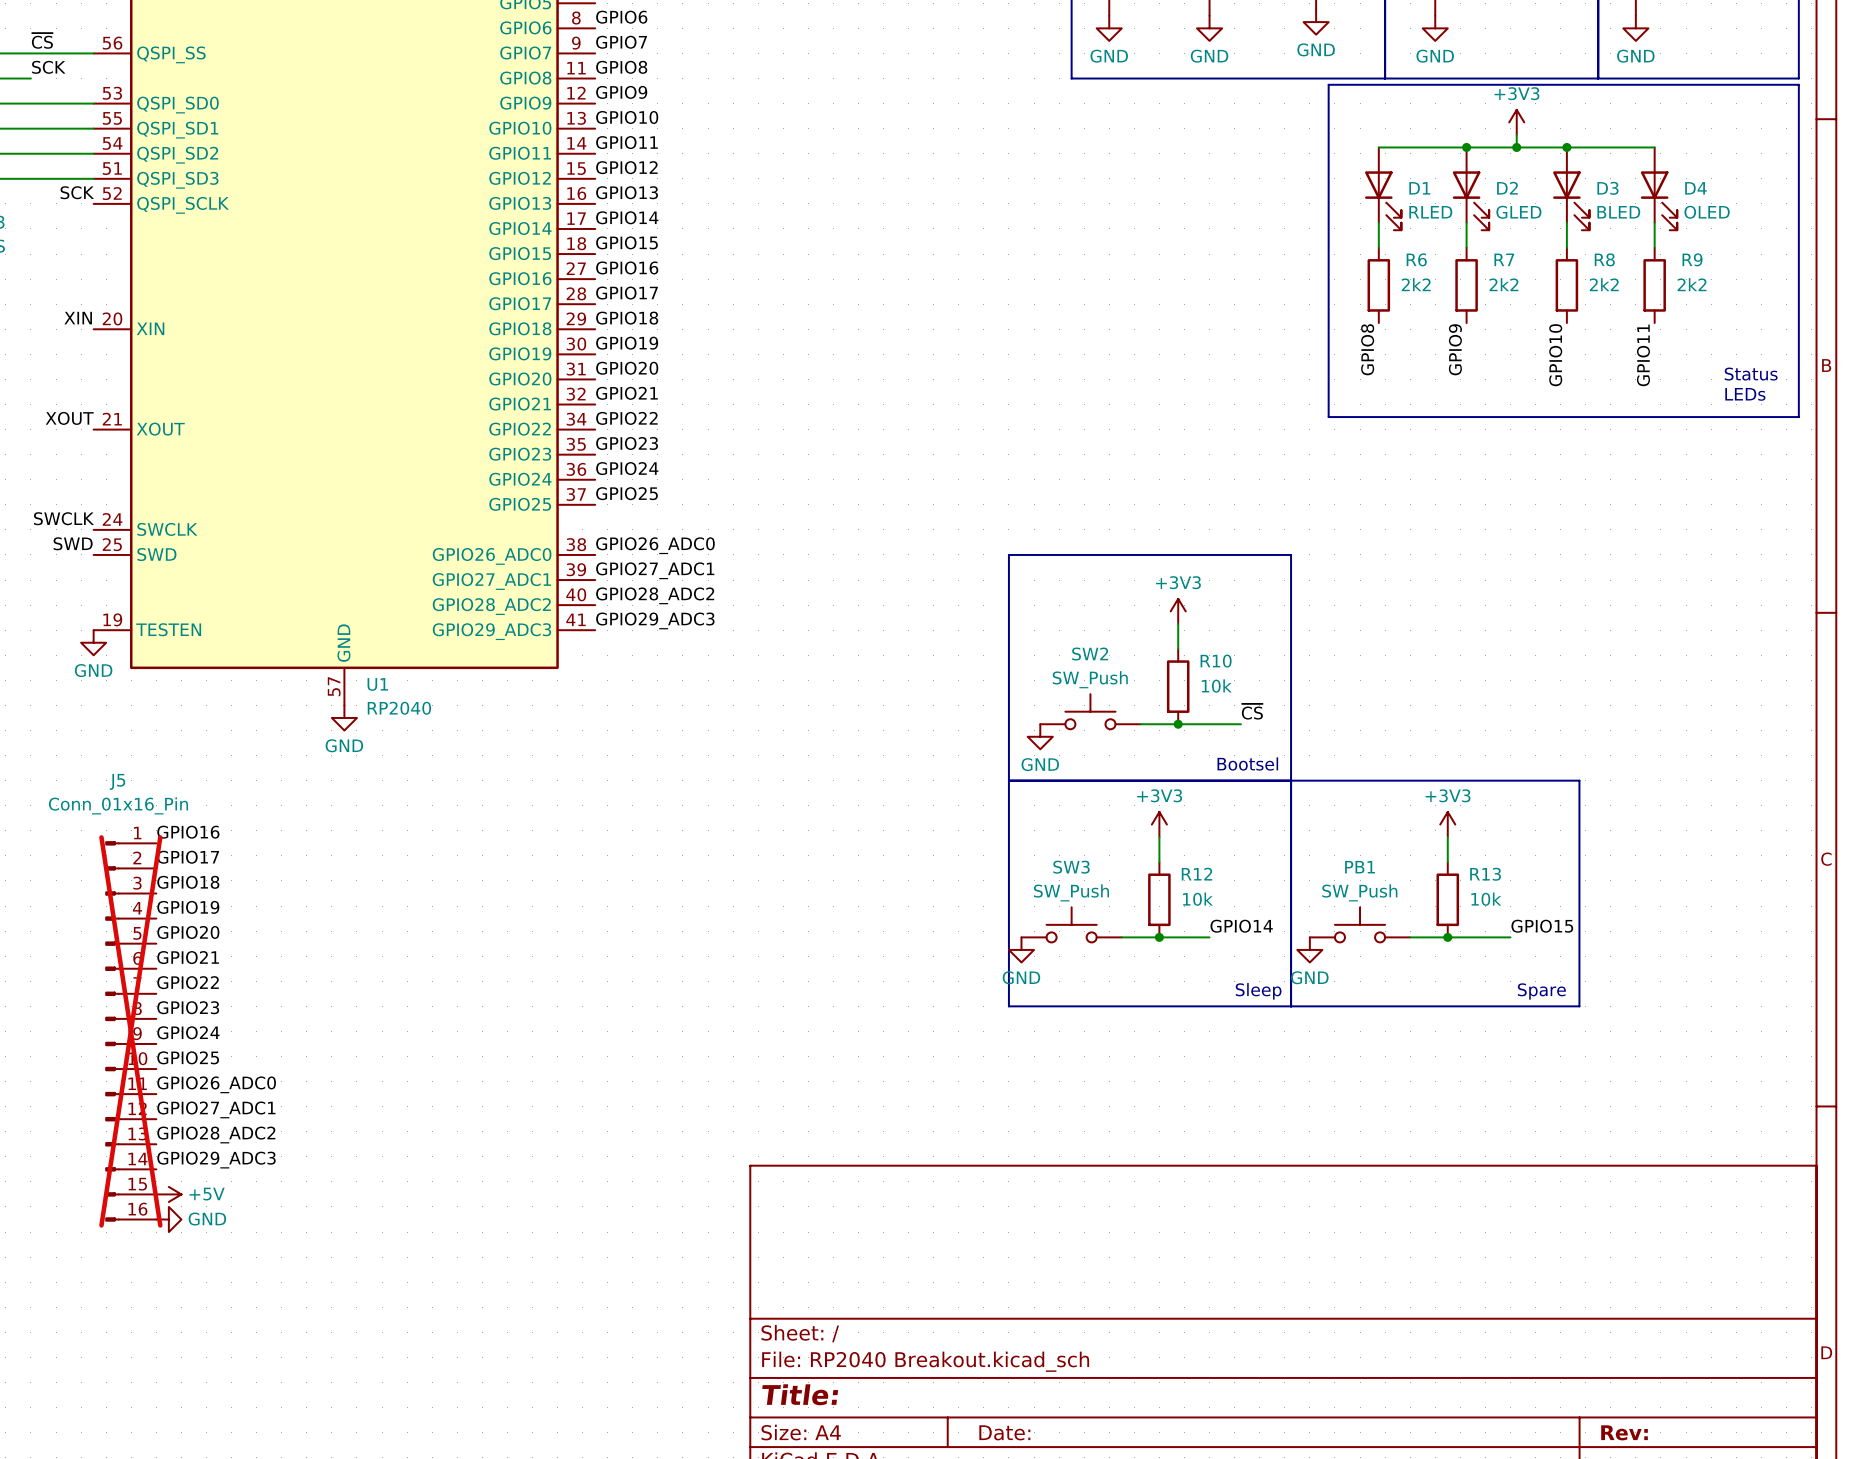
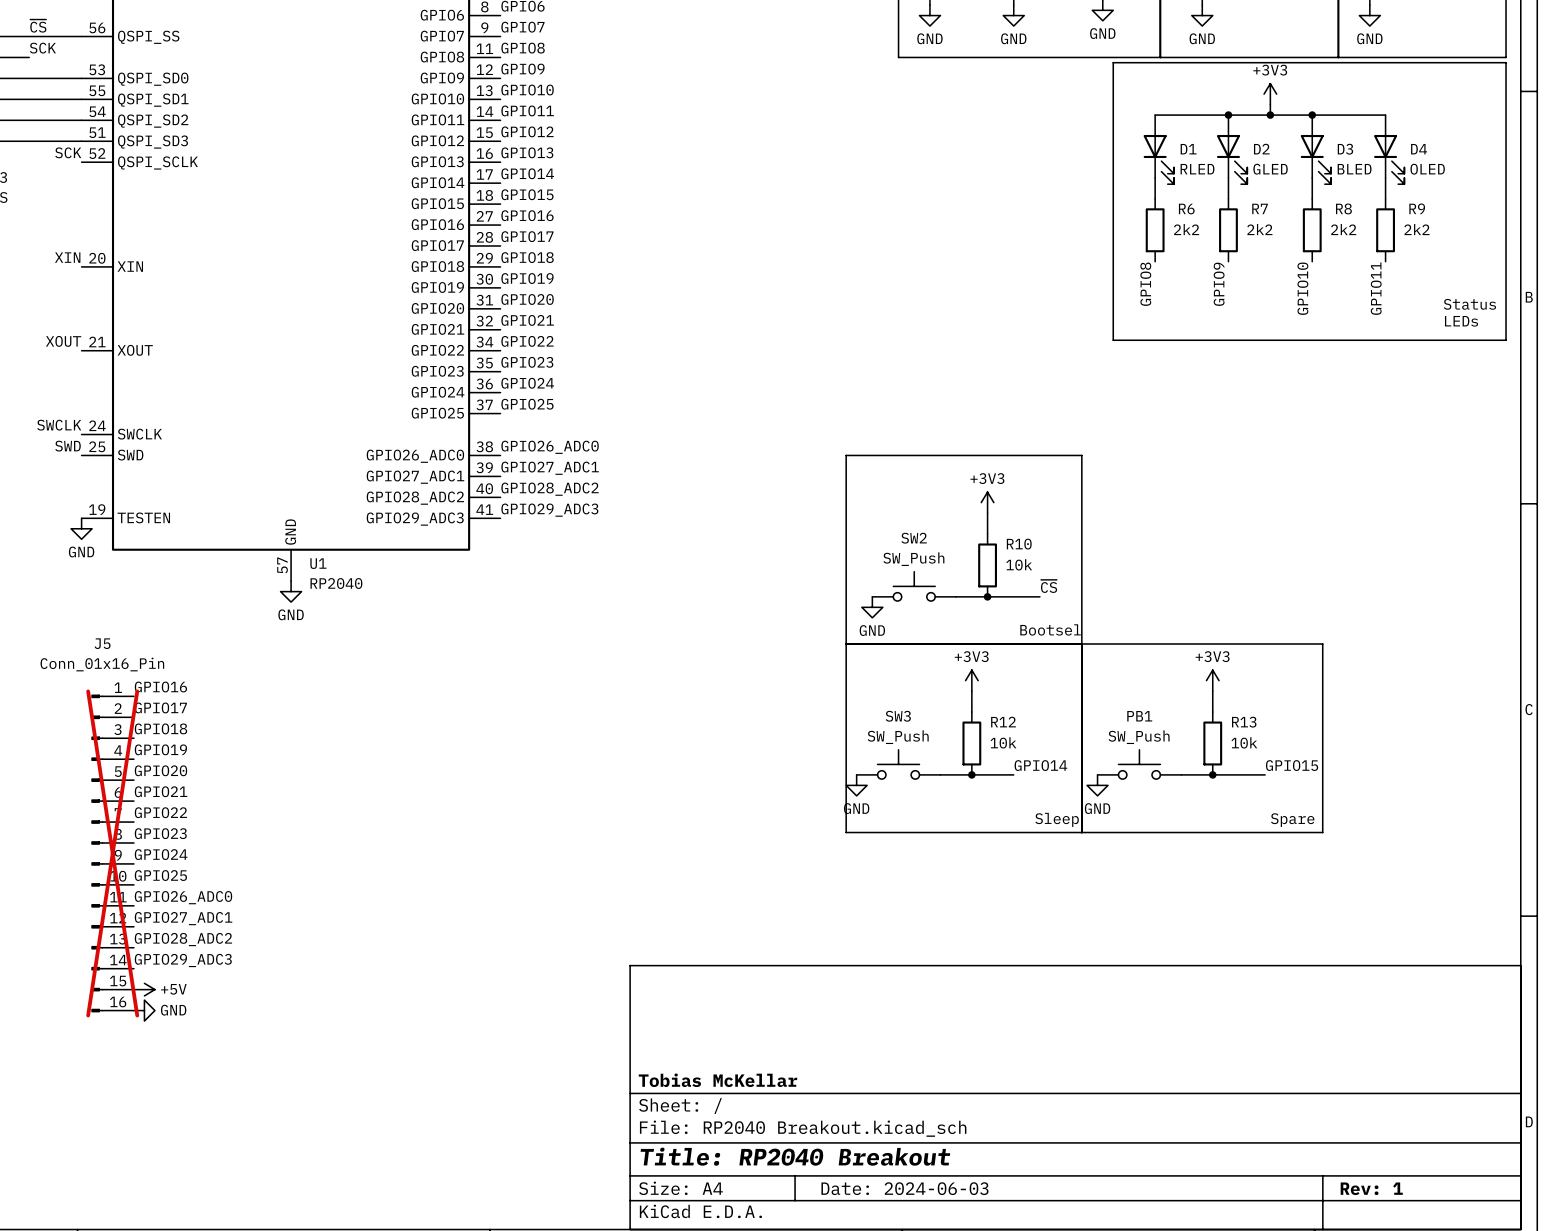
title block: none -> Tobias McKellar (717, 1080)
title block: Title: (800, 1394) -> Title: RP2040 Breakout (795, 1156)
title block: Date: (1004, 1432) -> Date: 2024-06-03 (904, 1188)
title block: Rev: (1624, 1432) -> Rev: 1 (1371, 1188)

